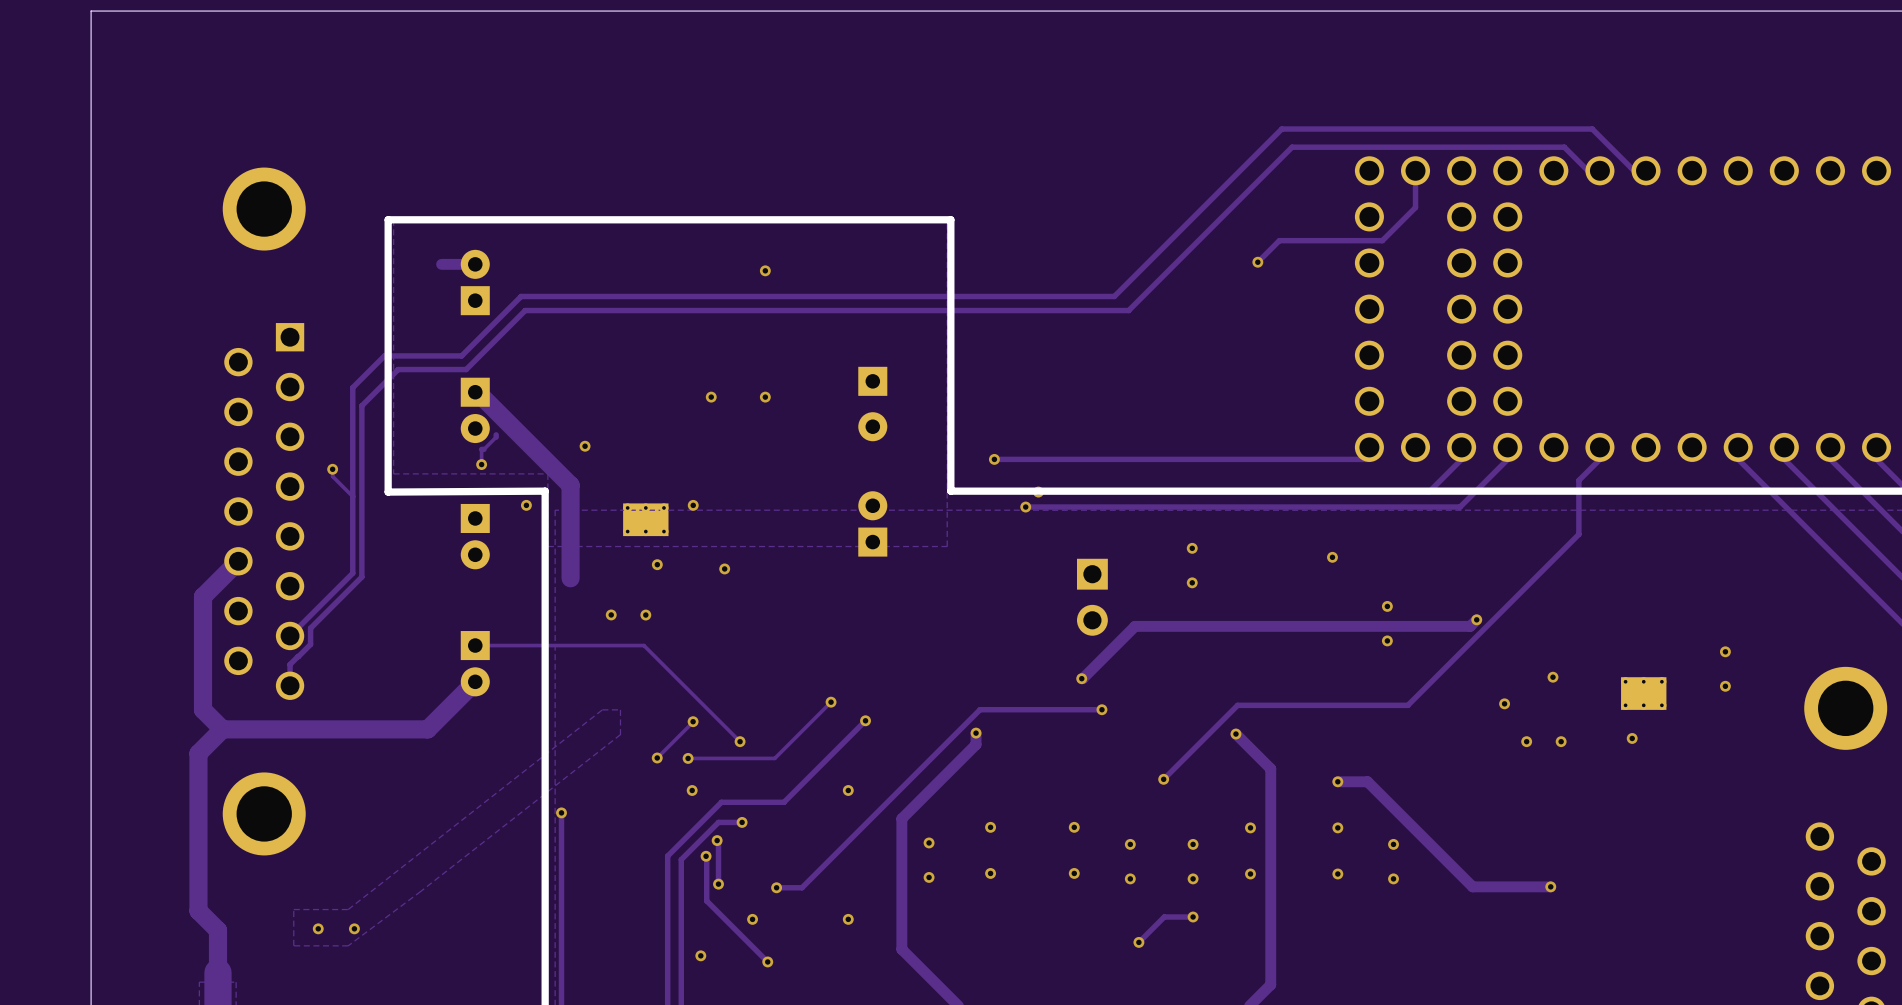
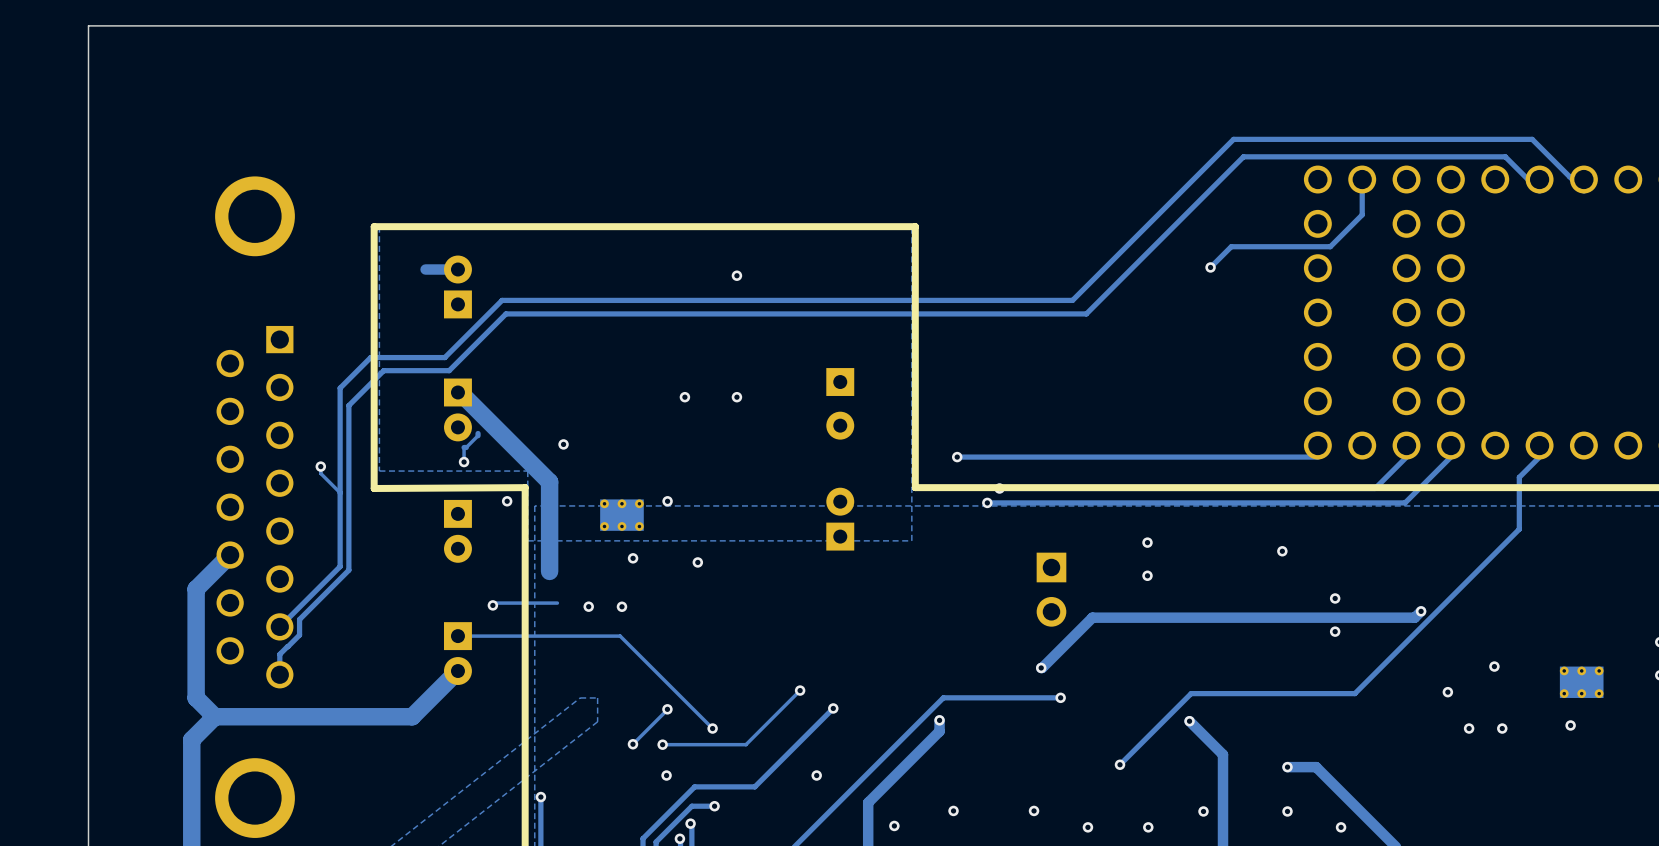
track: none -> (557, 603) (495, 603) (492, 605)
via: none -> (492, 605)

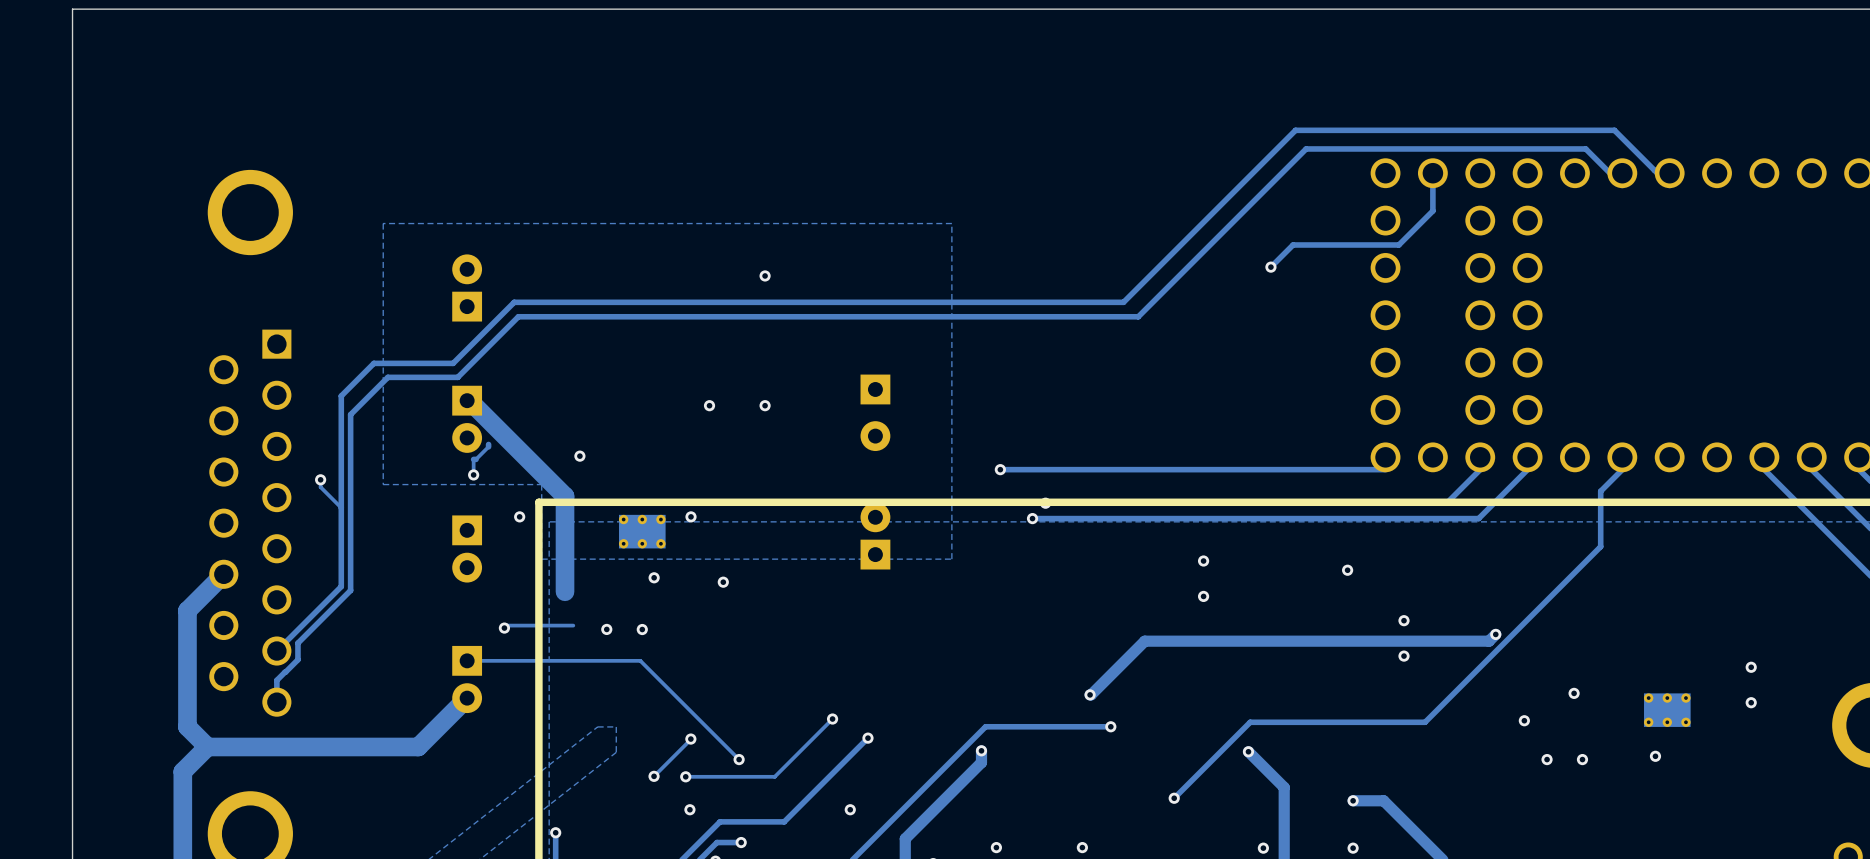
track: (457, 269) (425, 269) -> none
line: (915, 487) (915, 226) (374, 226) (374, 488) (525, 487) -> (955, 502) (538, 502)
part: (1051, 589) -> none

